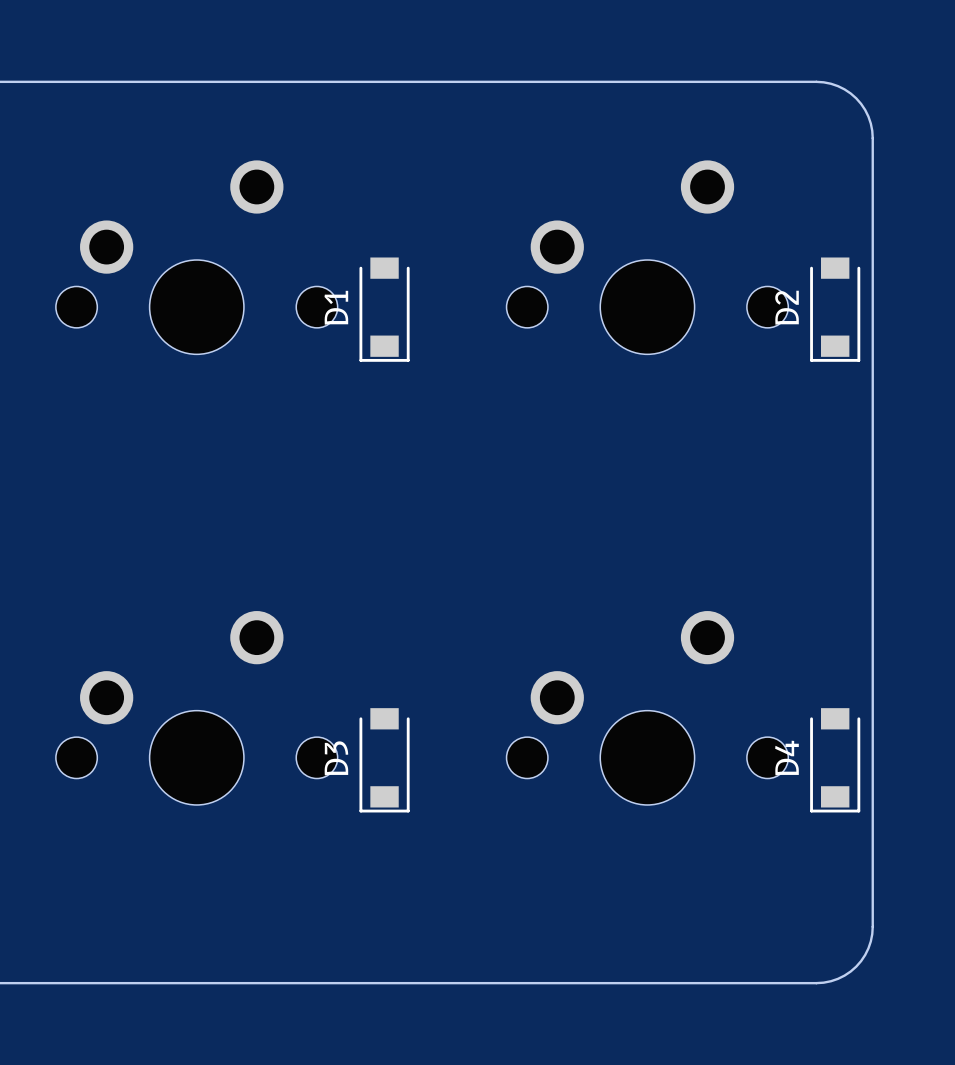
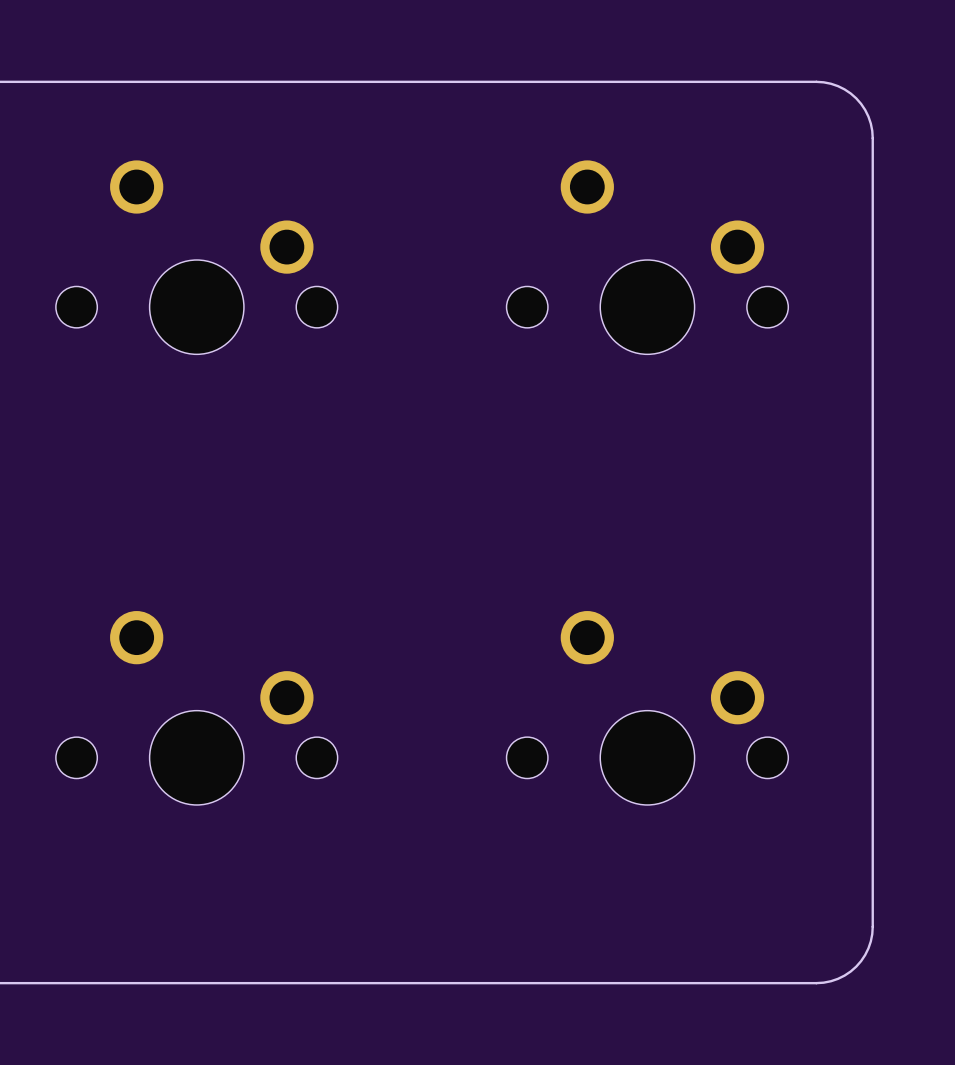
part side: top (196, 257) -> bottom (196, 257)
part side: top (647, 257) -> bottom (647, 257)
D1: (384, 309) -> none
D2: (835, 309) -> none
part side: top (196, 708) -> bottom (196, 708)
part side: top (647, 708) -> bottom (647, 708)
D3: (384, 760) -> none
D4: (835, 760) -> none

